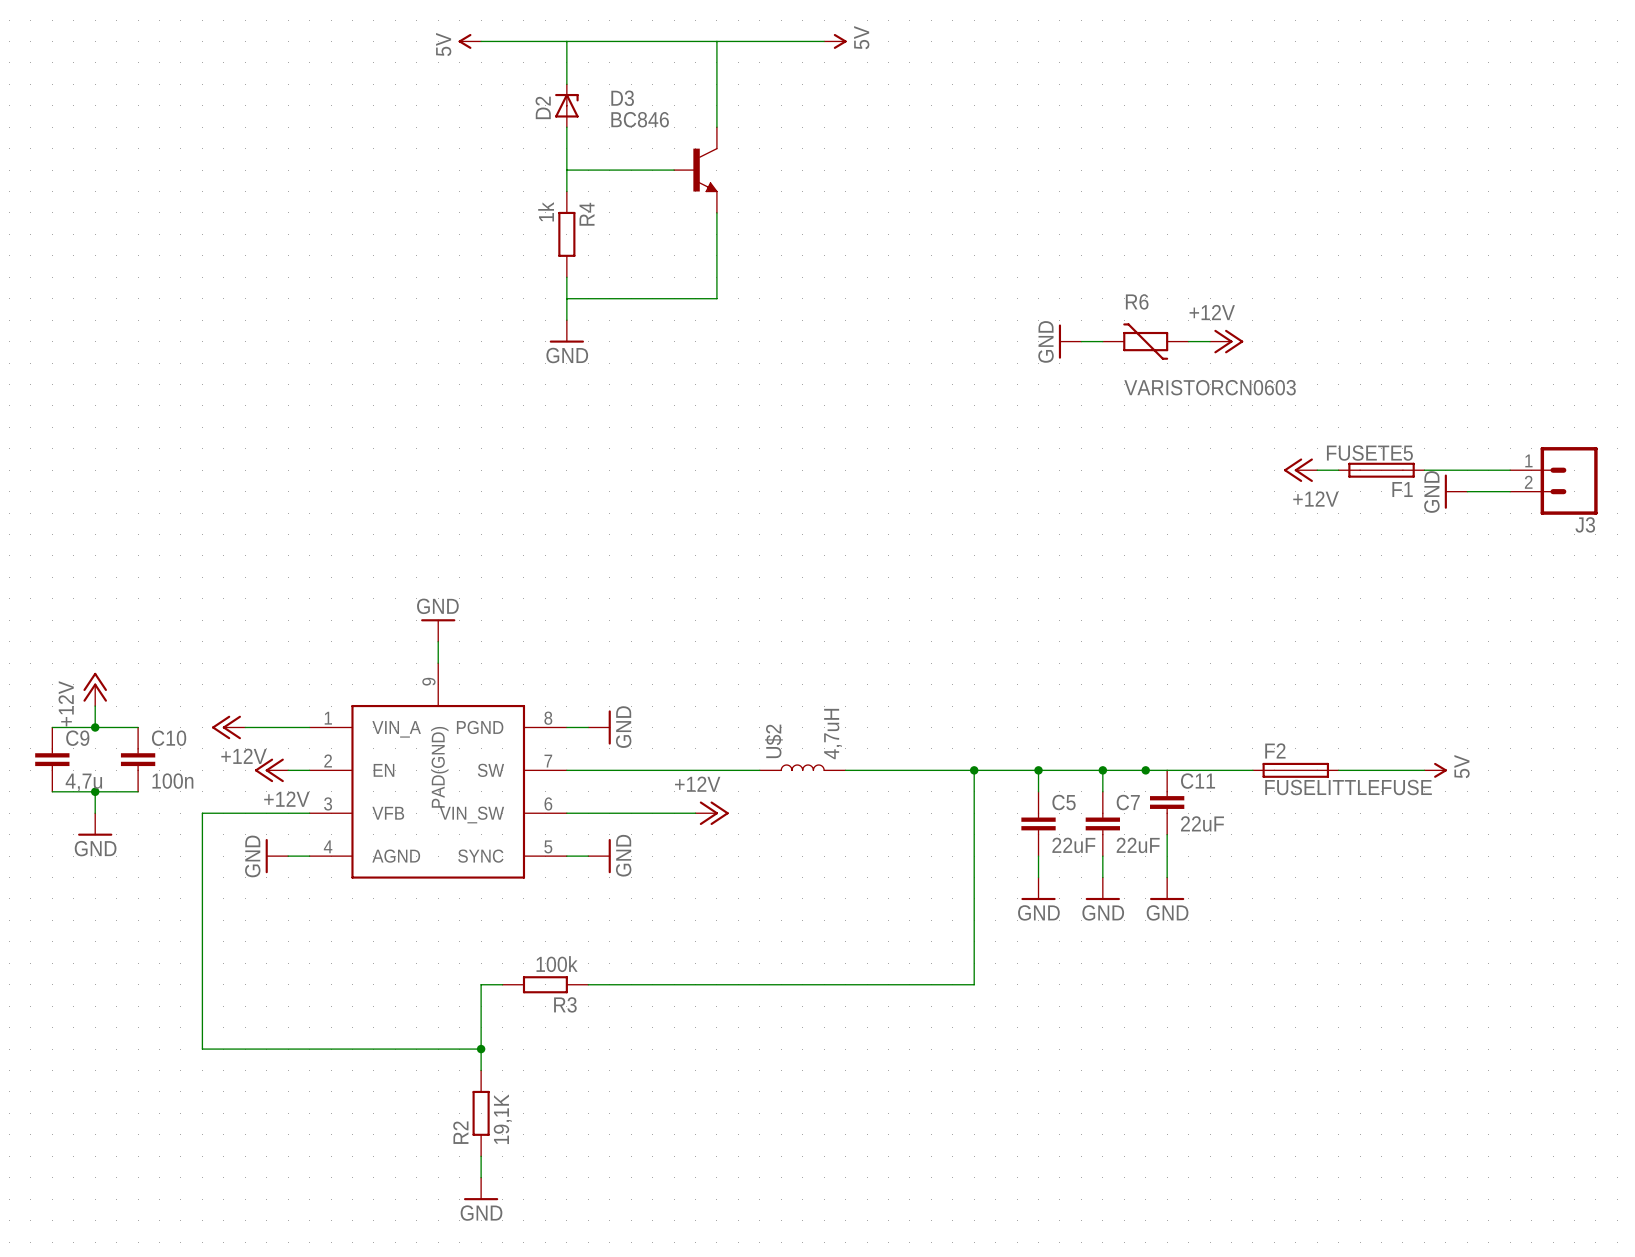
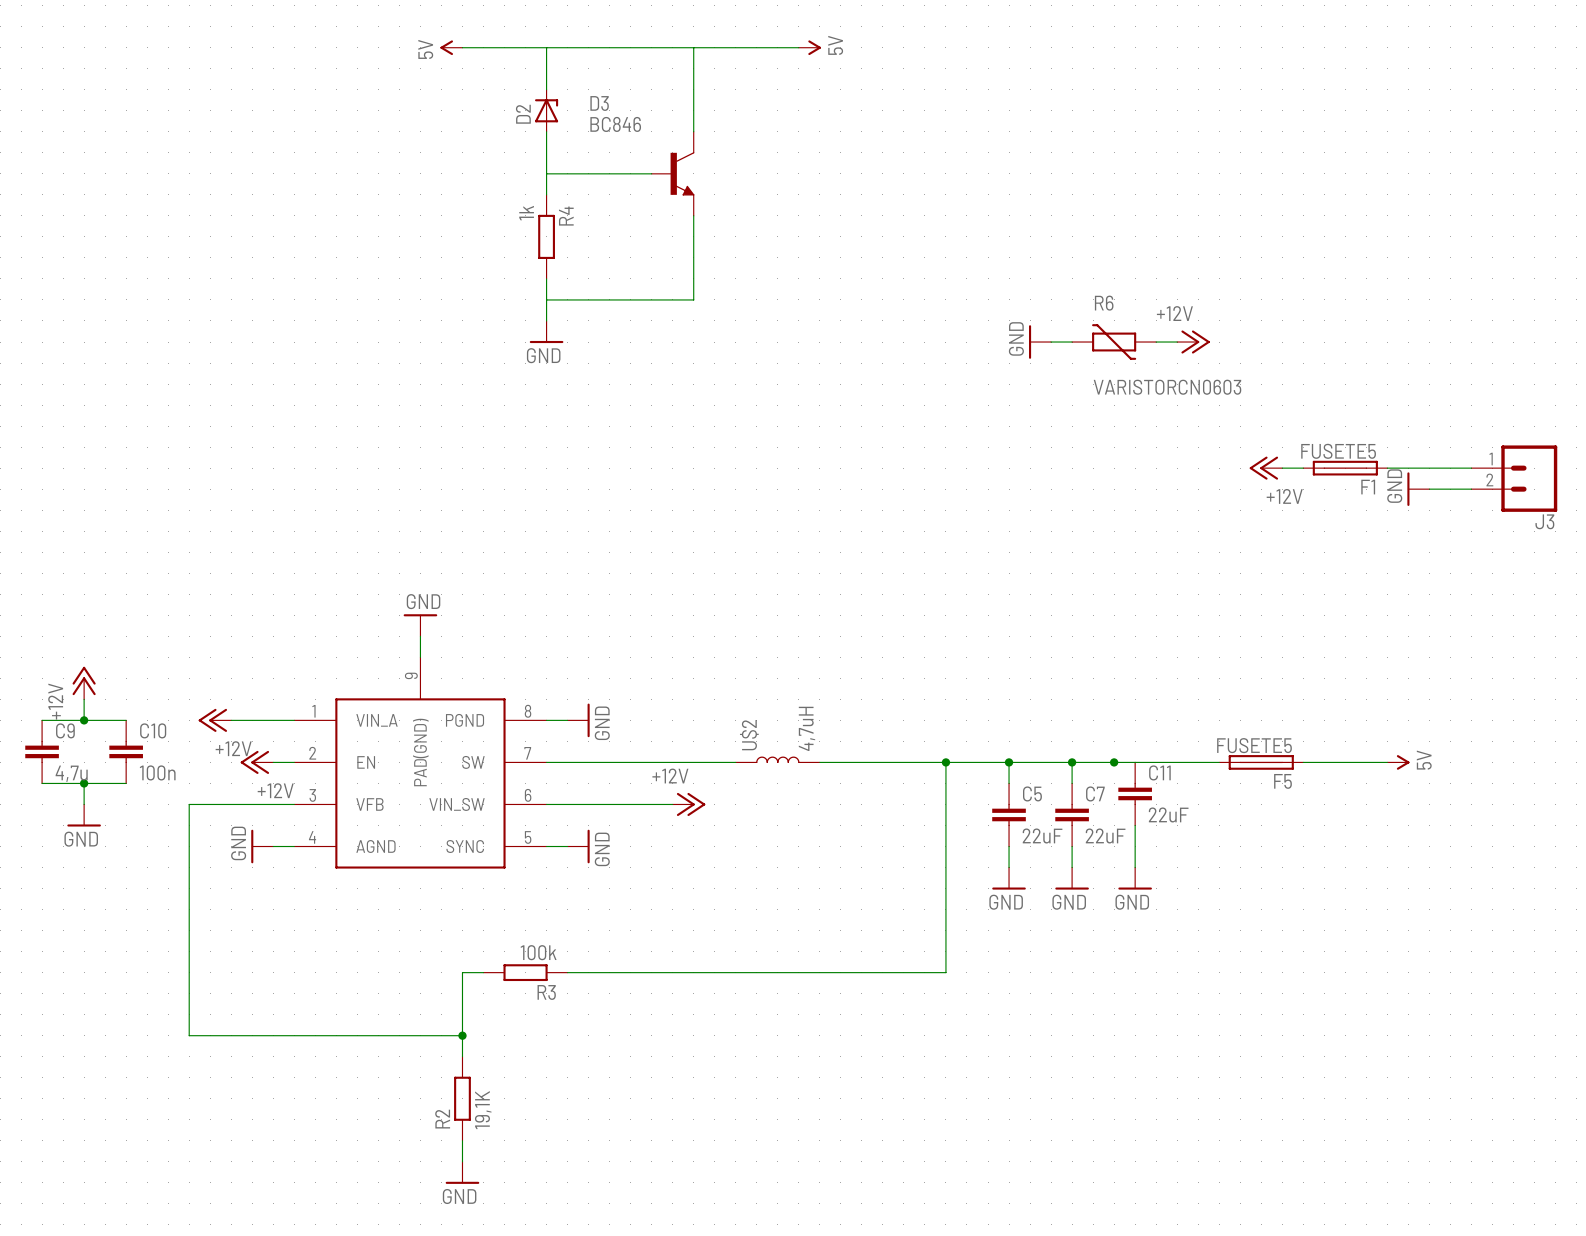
F2 name: F2 (1275, 750) -> F5 (1282, 781)
F2 value: FUSELITTLEFUSE (1348, 787) -> FUSETE5 (1254, 745)

